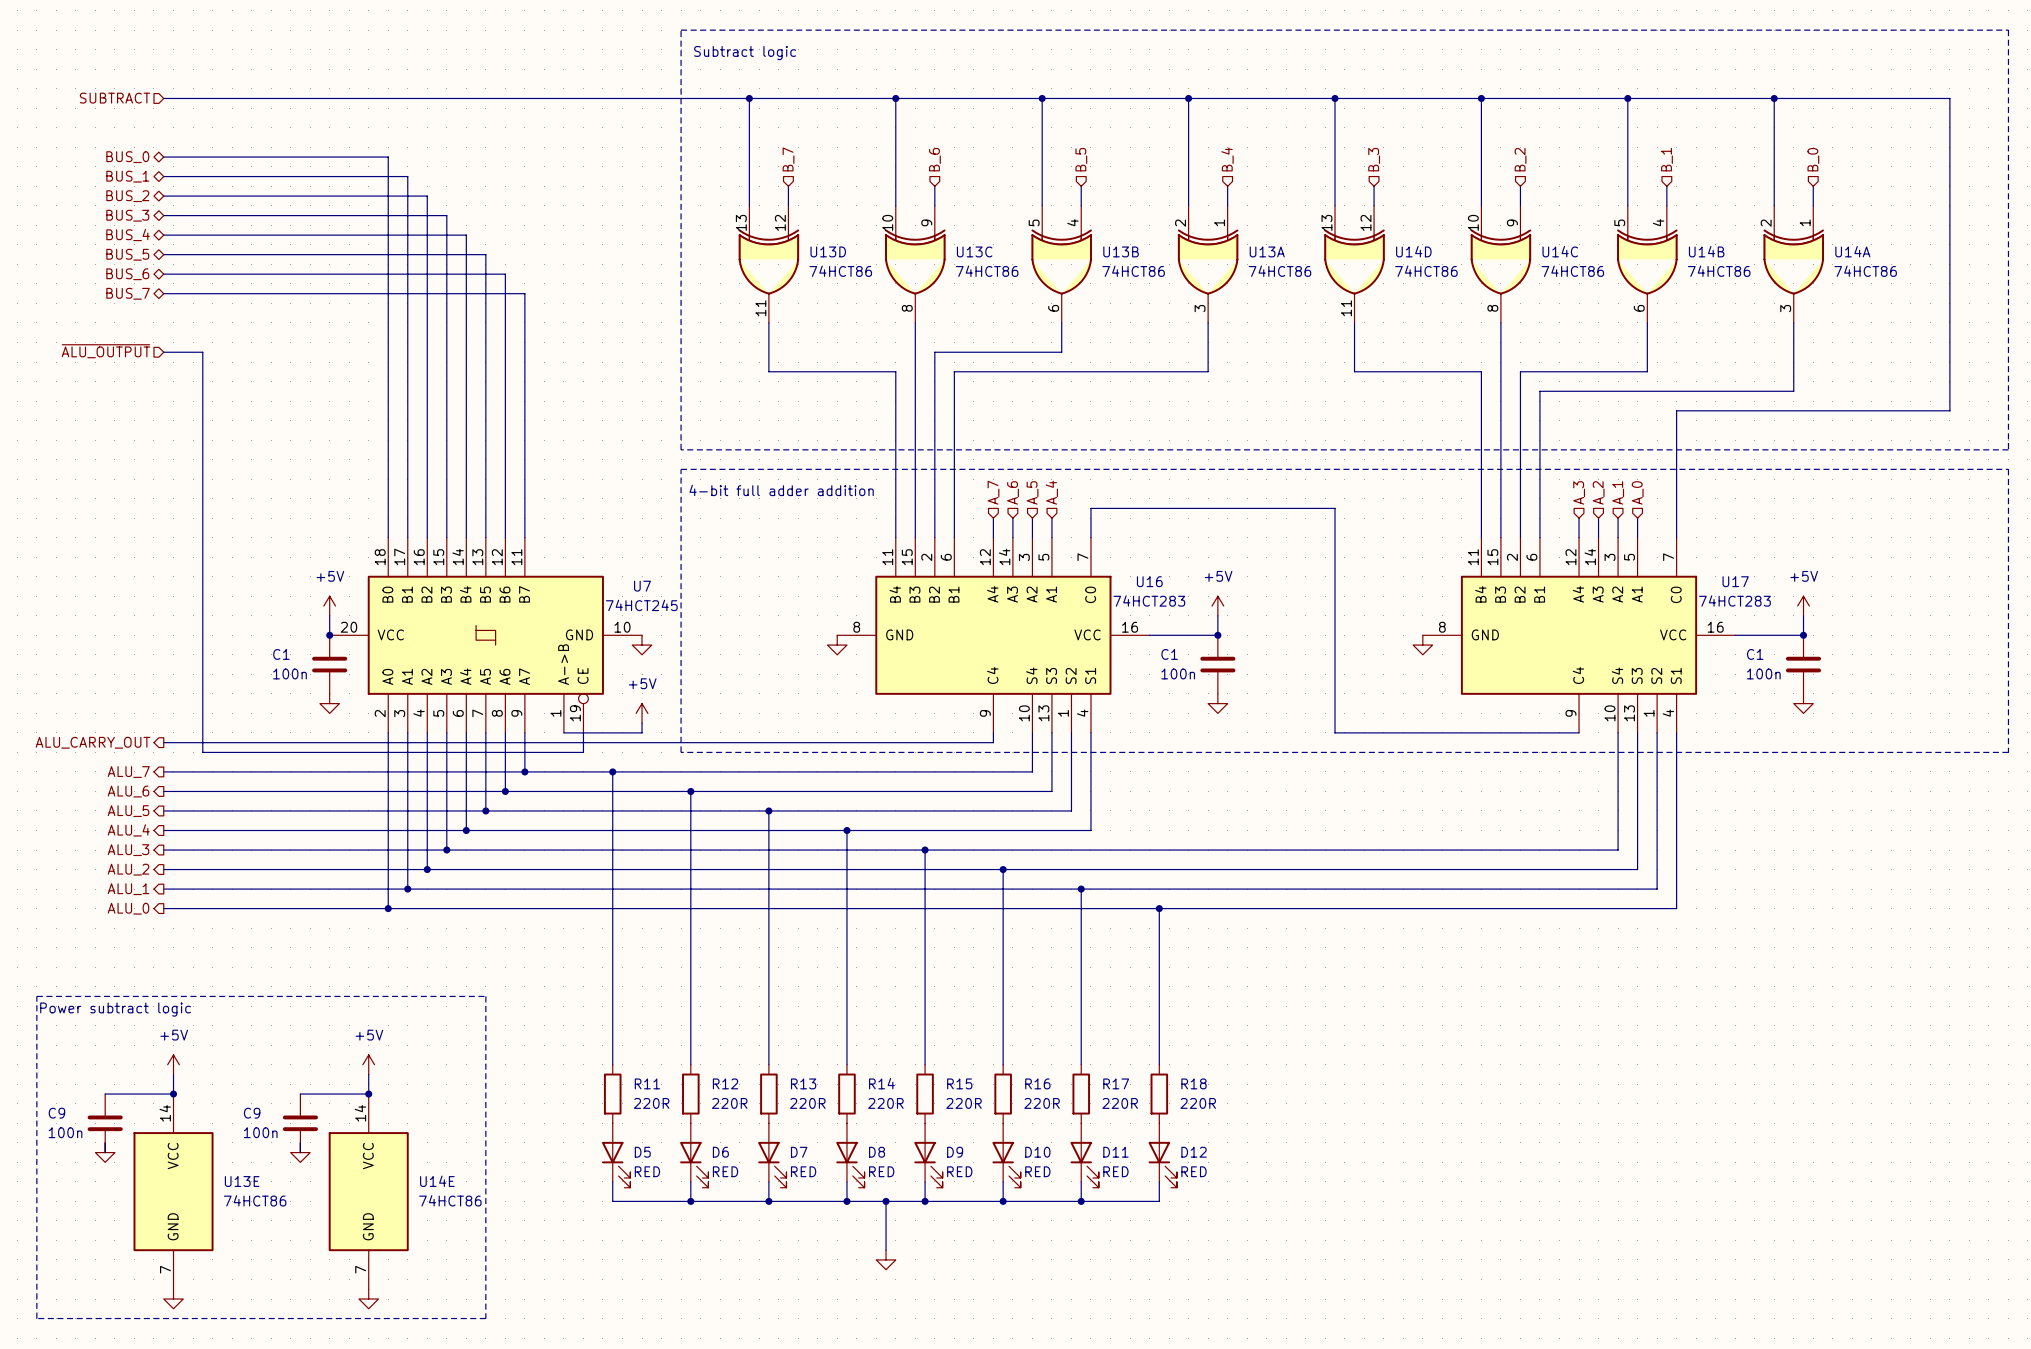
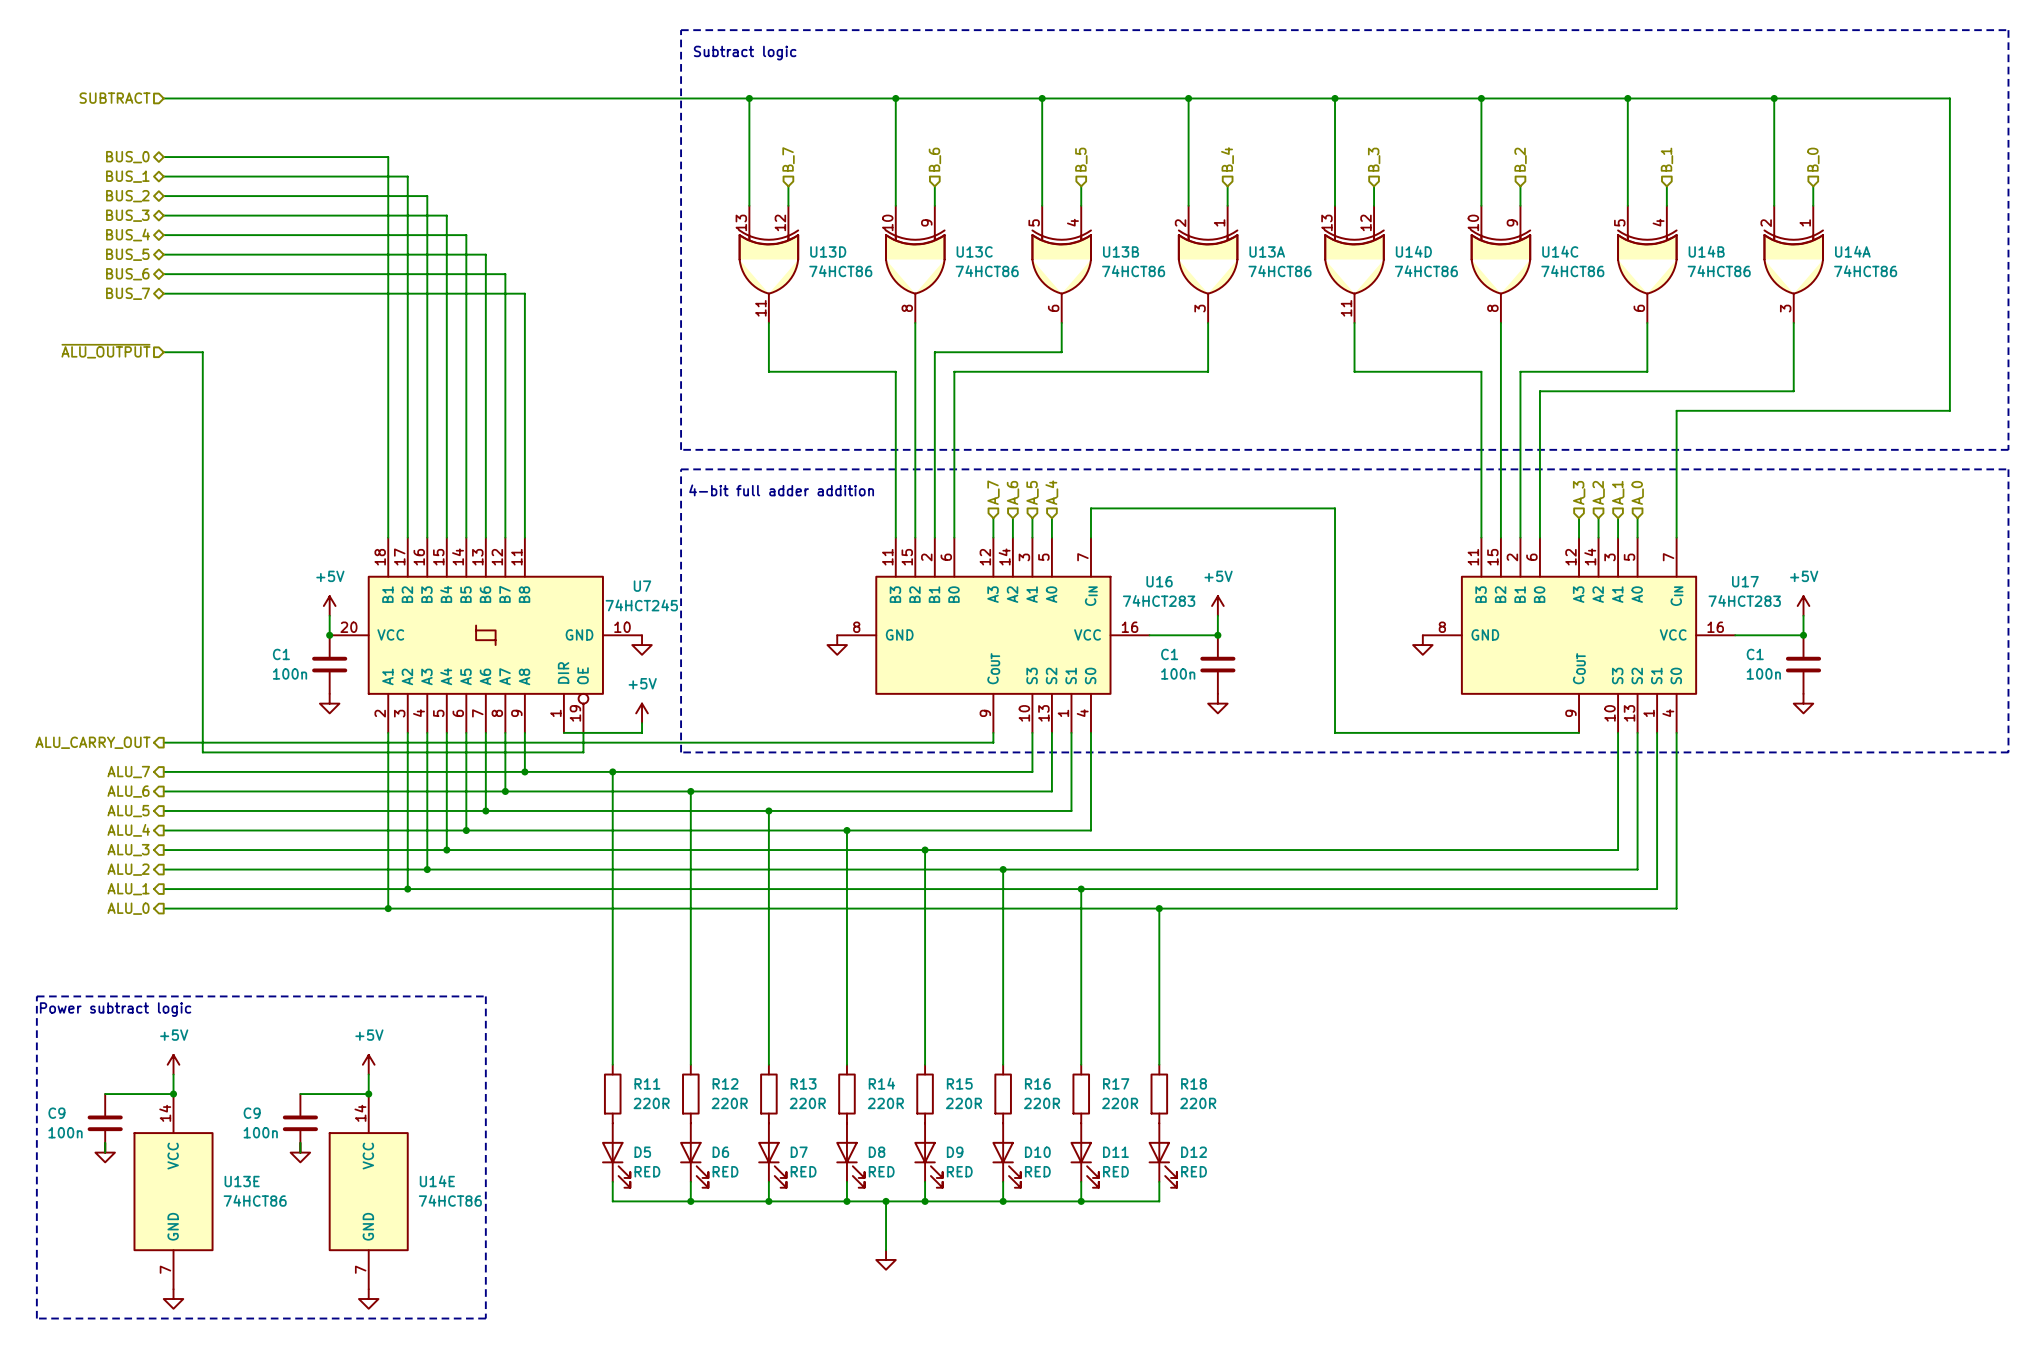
U7 symbol: [329, 537, 643, 733] -> [329, 537, 643, 733]
U16 symbol: [837, 537, 1150, 733] -> [837, 537, 1150, 733]
U17 symbol: [1422, 537, 1736, 733] -> [1422, 537, 1736, 733]

